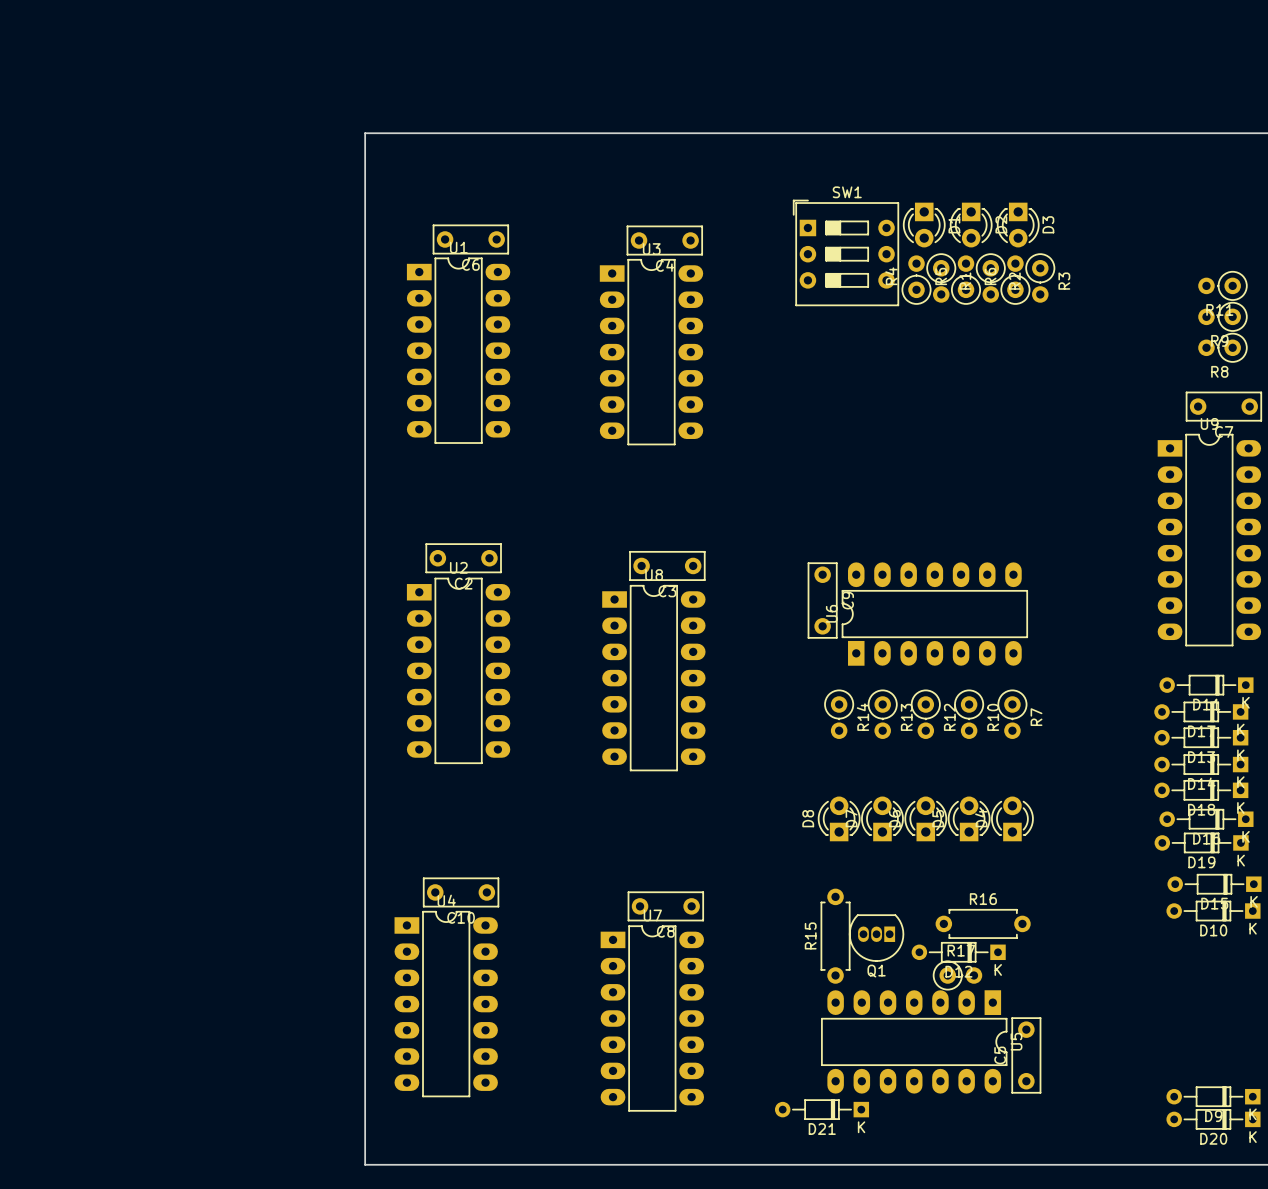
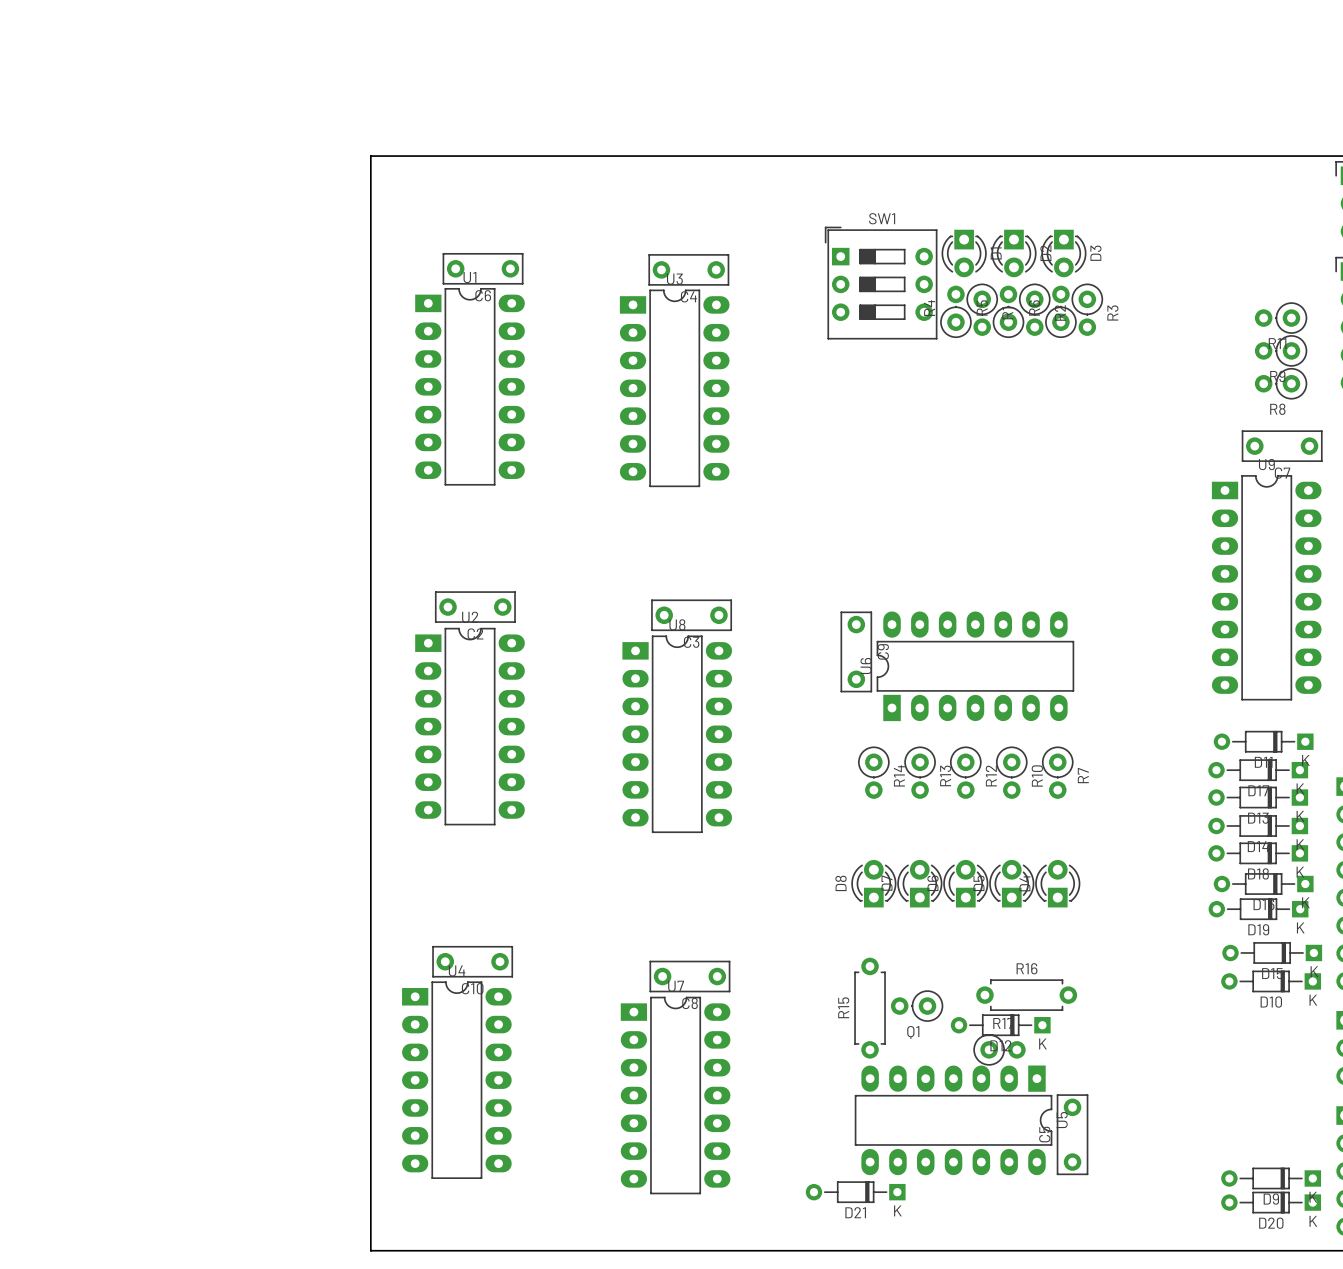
Q1 footprint: [849, 914, 905, 962] -> [890, 990, 944, 1022]

